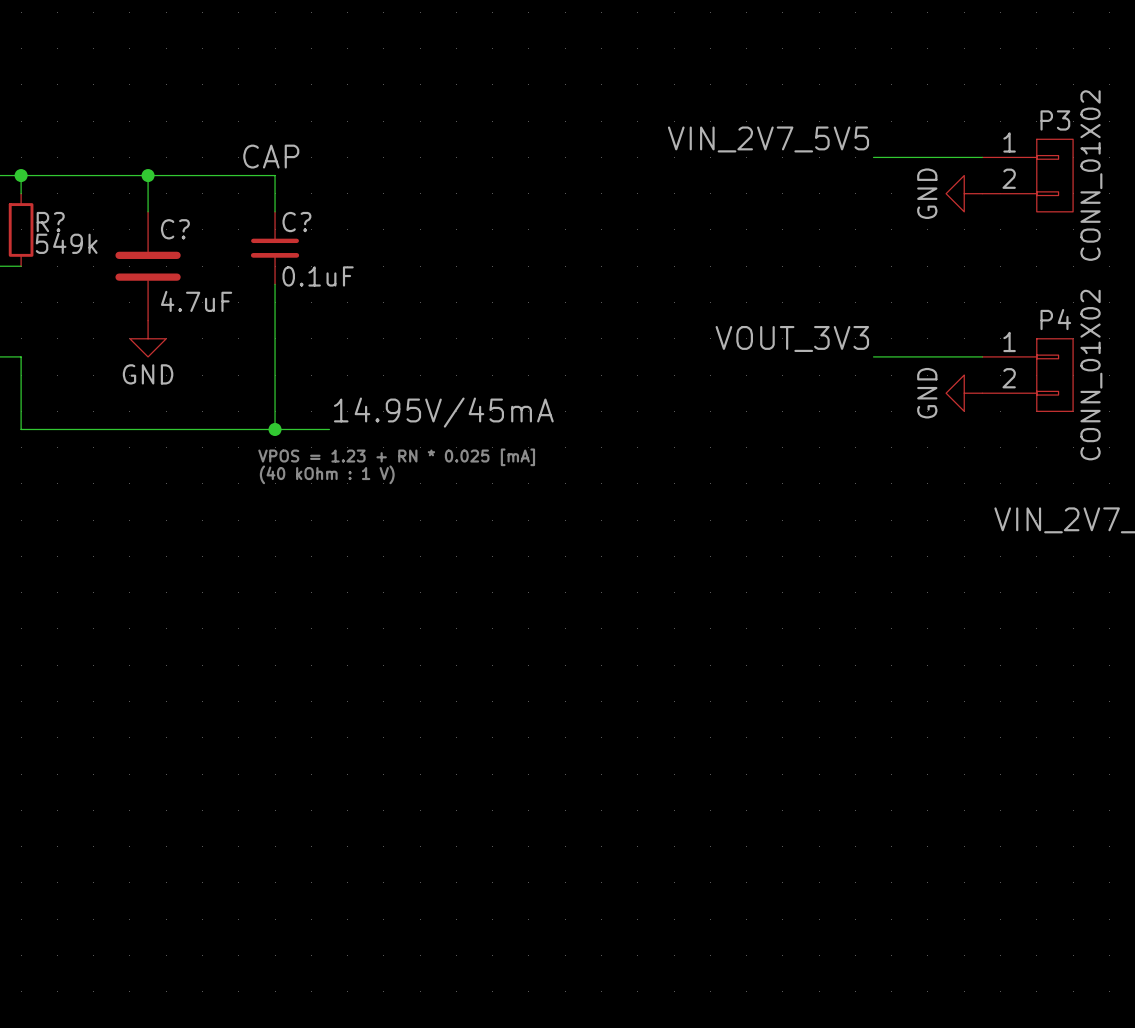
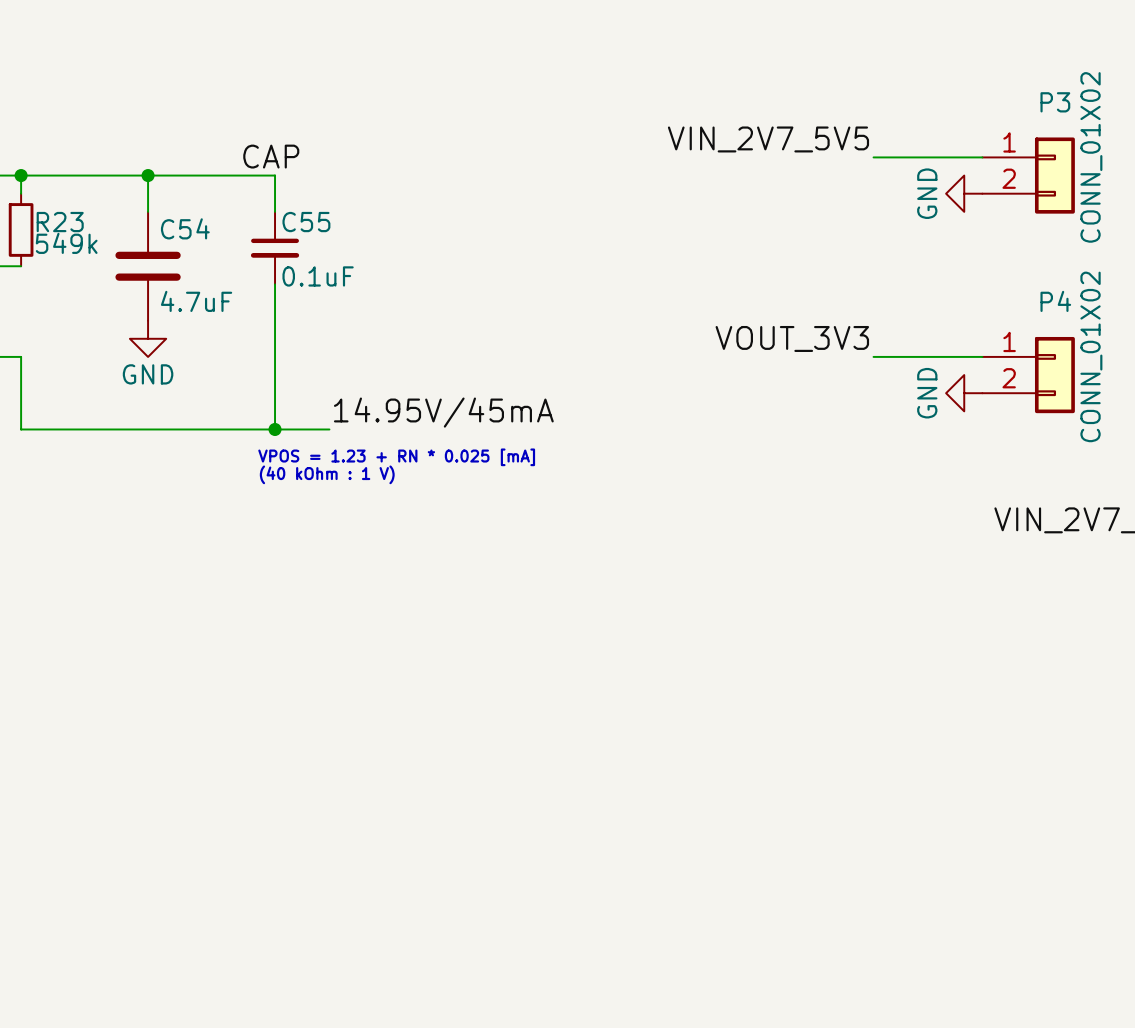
P3 symbol: [982, 139, 1074, 212] -> [982, 137, 1075, 214]
R? name: R? (50, 222) -> R23 (60, 222)
C? name: C? (175, 229) -> C54 (185, 228)
C?: 0.1uF (275, 248) -> none
C55: none -> 0.1uF (275, 248)
P4 symbol: [982, 338, 1074, 412] -> [982, 336, 1075, 414]

